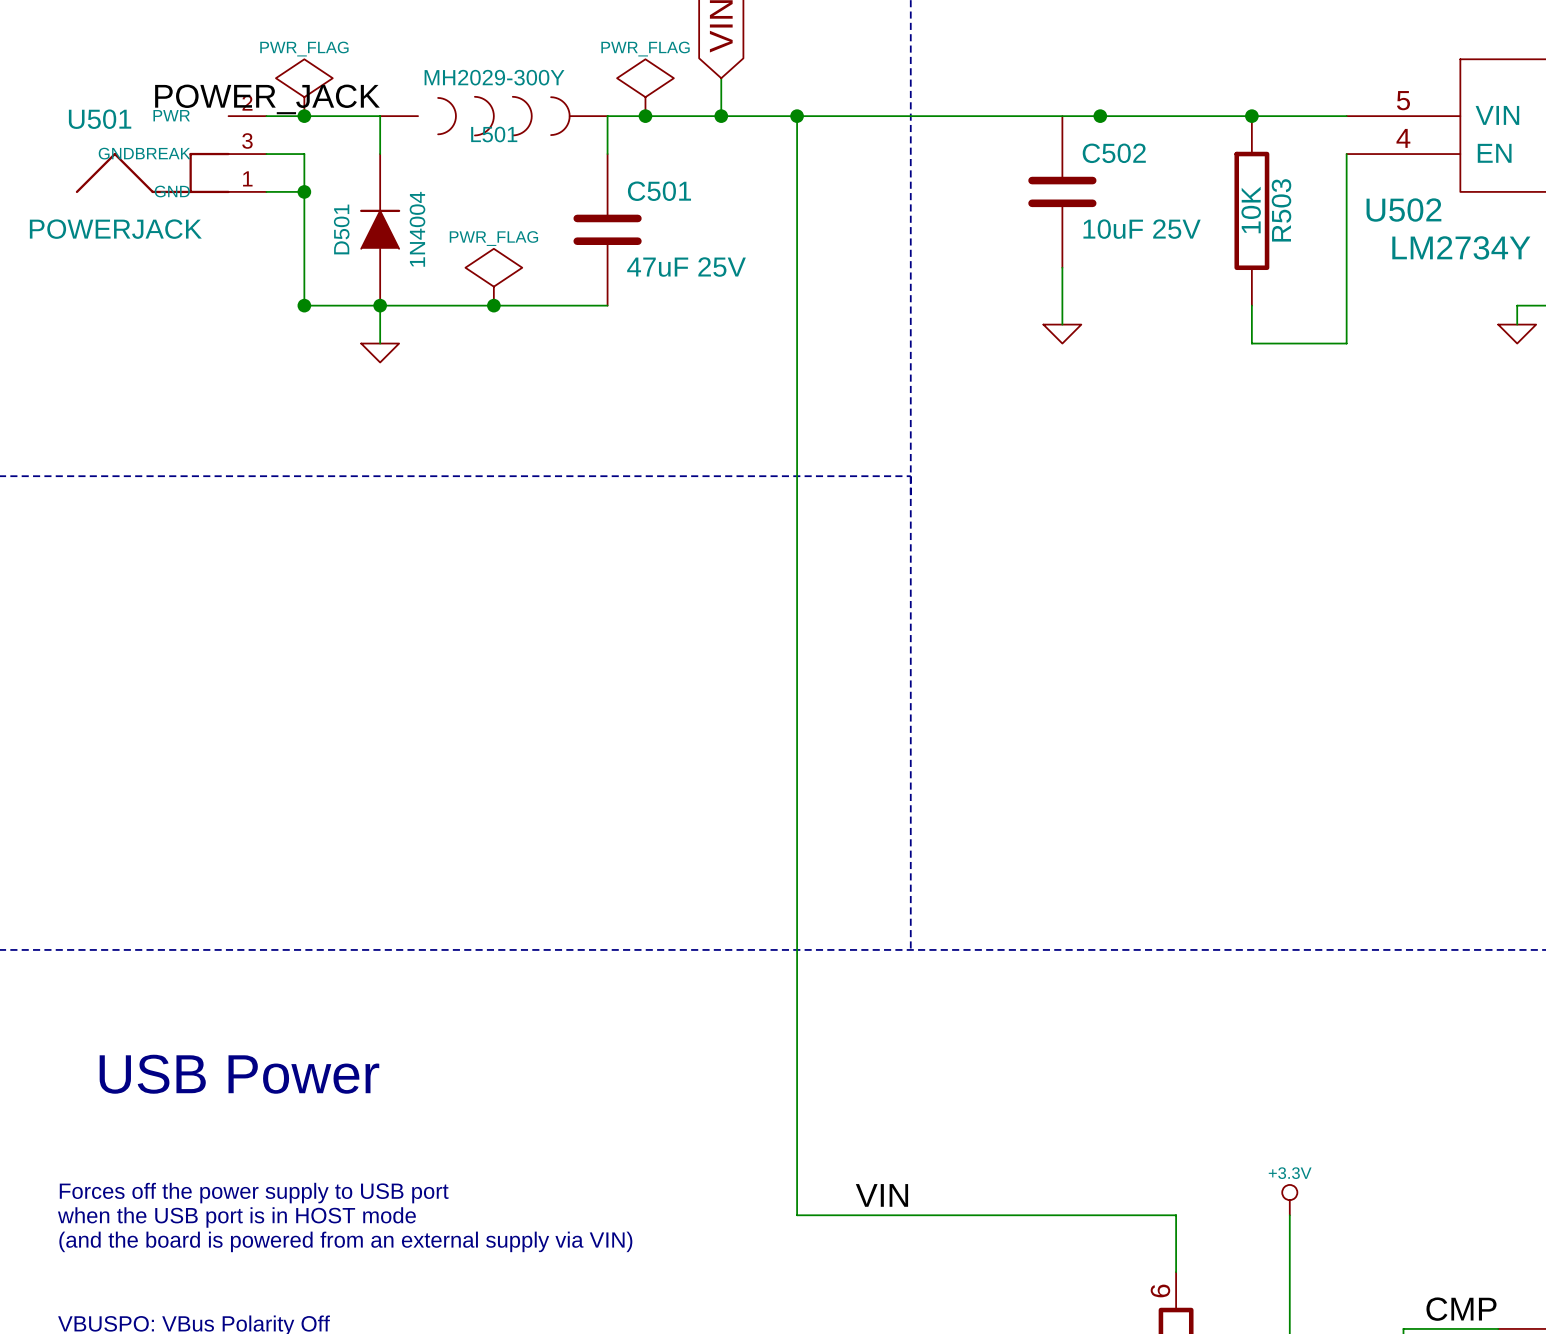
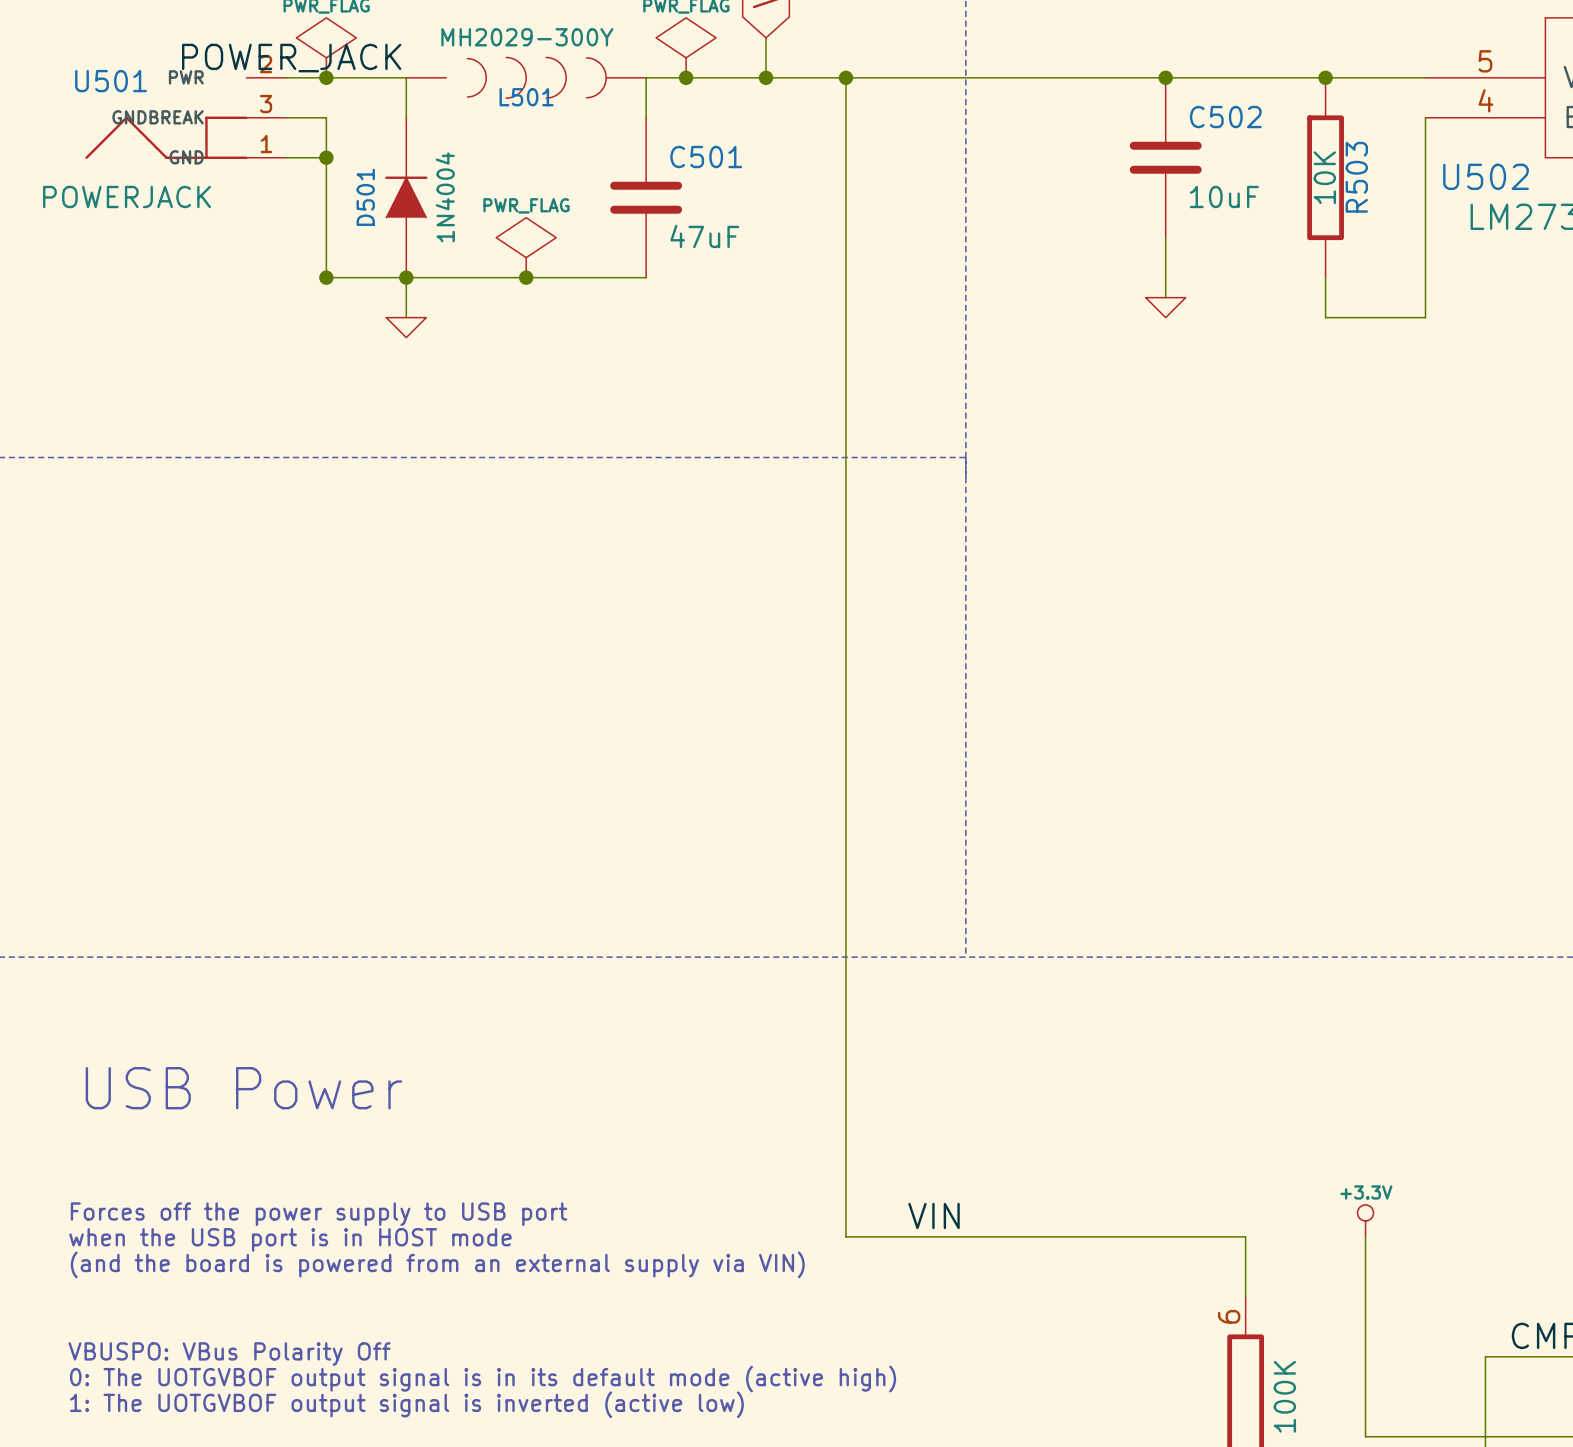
C502 position: (1062, 191) -> (1165, 157)
C502 value: 10uF 25V (1142, 229) -> 10uF (1224, 196)
C501 value: 47uF 25V (686, 267) -> 47uF (704, 236)
wire: (1062, 267) (1062, 324) -> (1165, 237) (1165, 297)
power symbol position: (1062, 334) -> (1165, 307)

